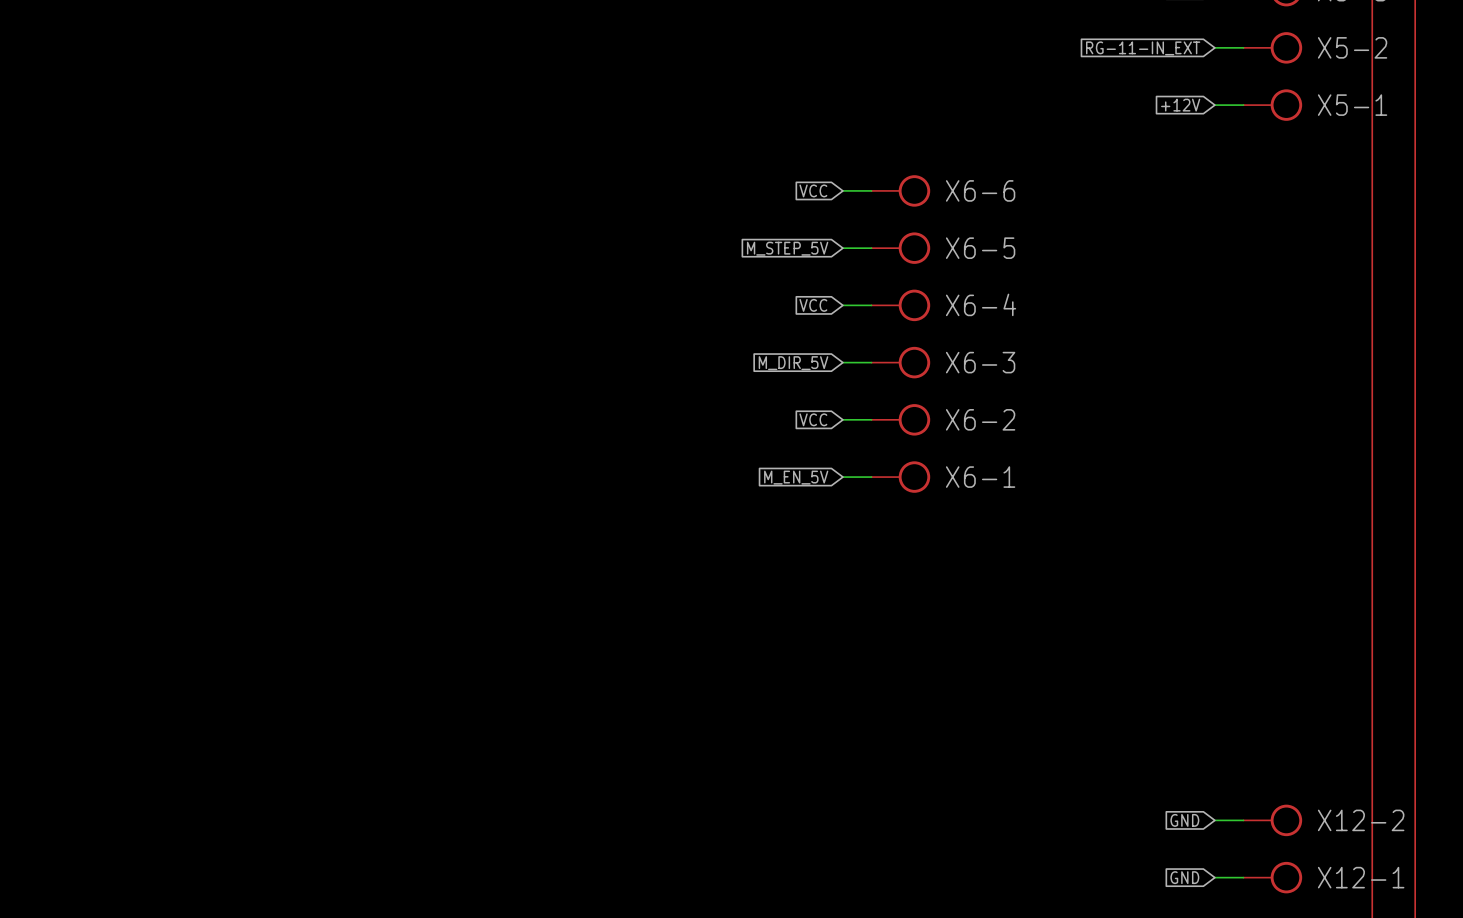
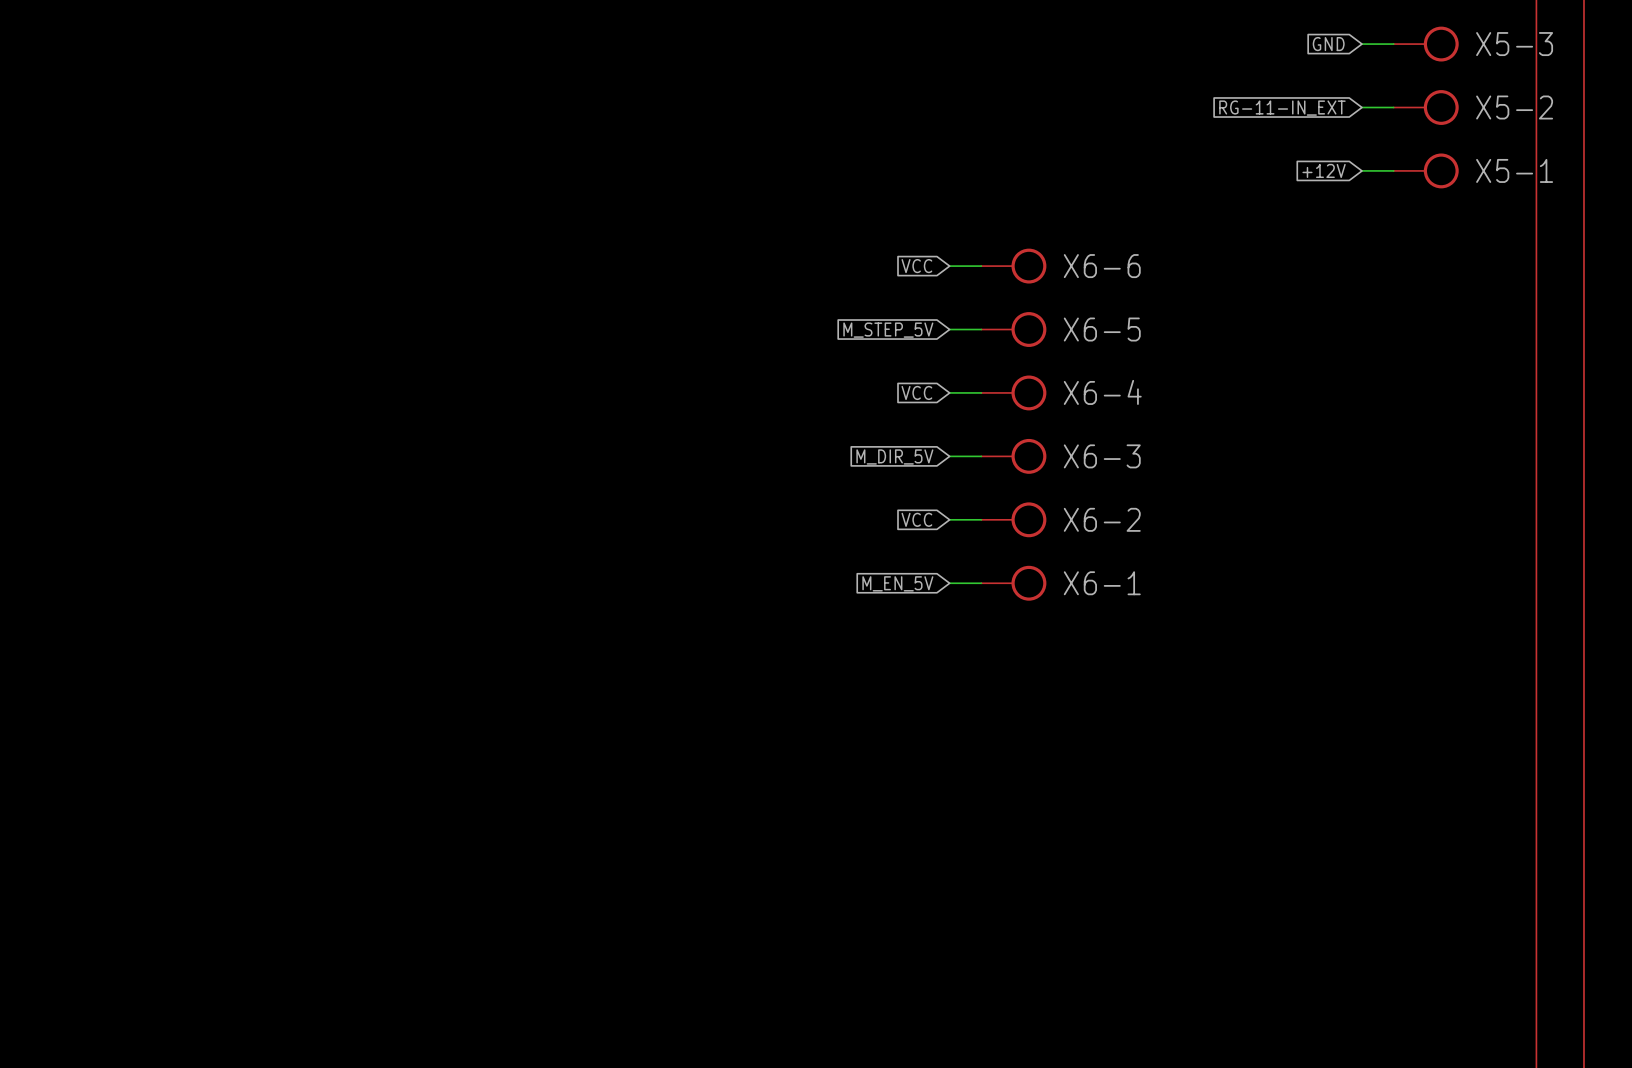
global label: GND (1184, 820) -> none
wire: (1214, 820) (1243, 820) -> none
X12-2: (1272, 820) -> none
global label: GND (1184, 877) -> none
wire: (1214, 877) (1243, 877) -> none
X12-1: (1272, 877) -> none

